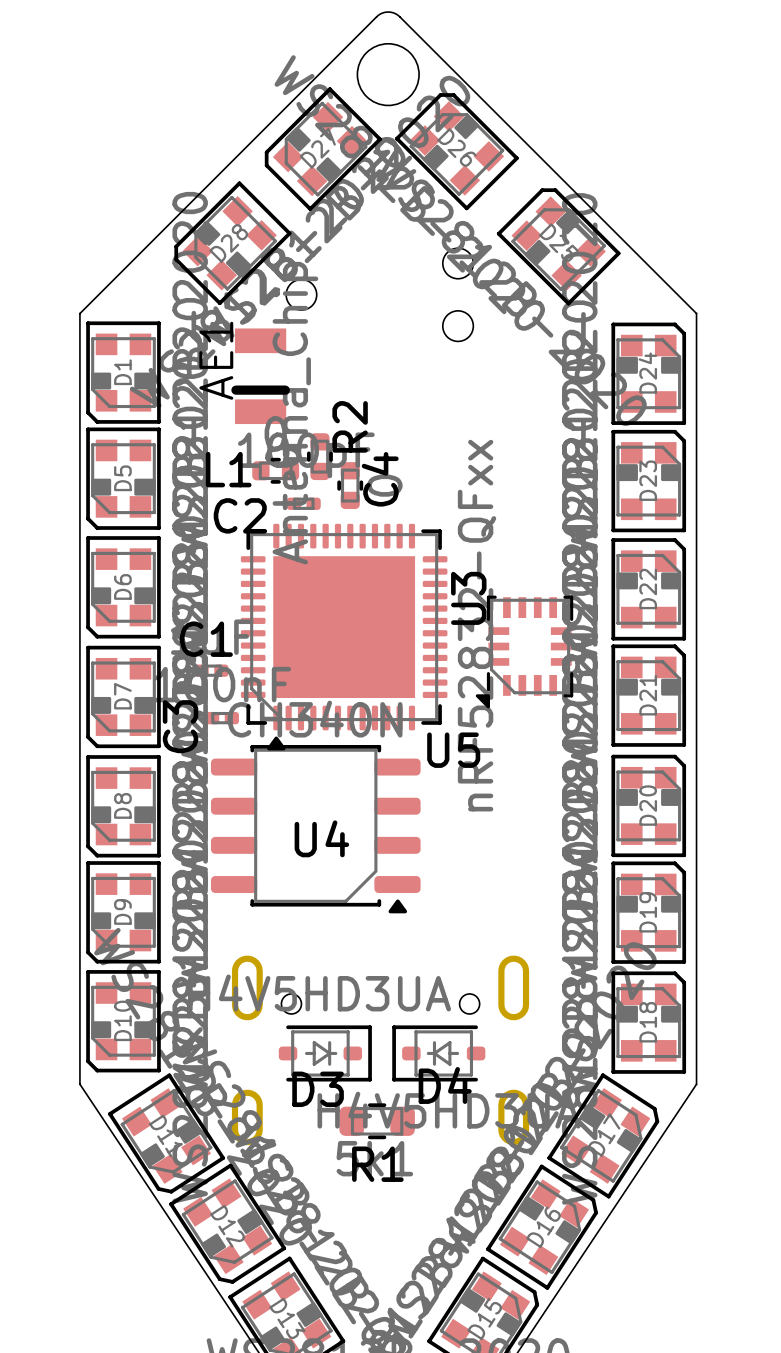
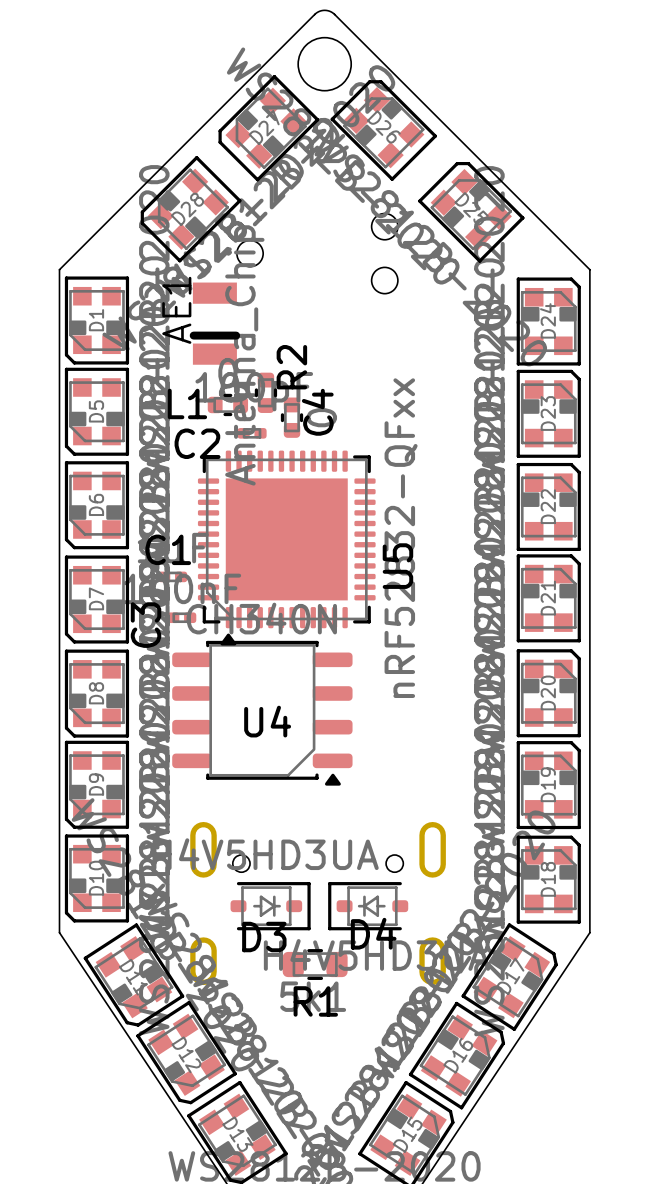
U3: (524, 652) -> none
U5 name rotation: 0° (453, 750) -> 90° counterclockwise (397, 566)
U5 name position: U5 (453, 750) -> U5 (397, 566)

